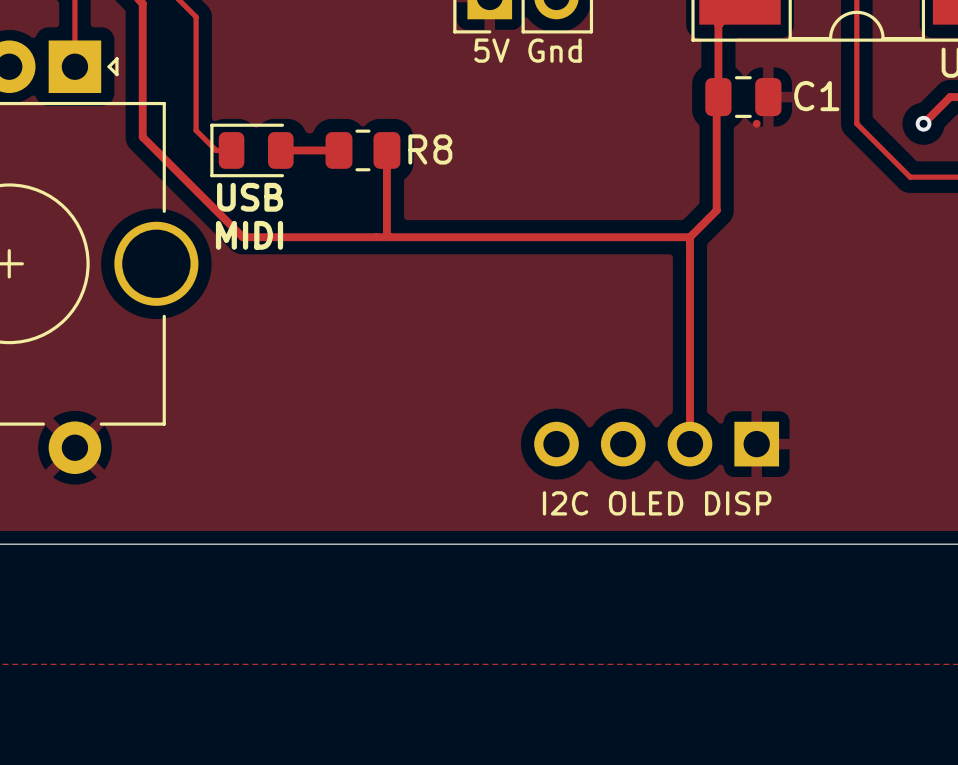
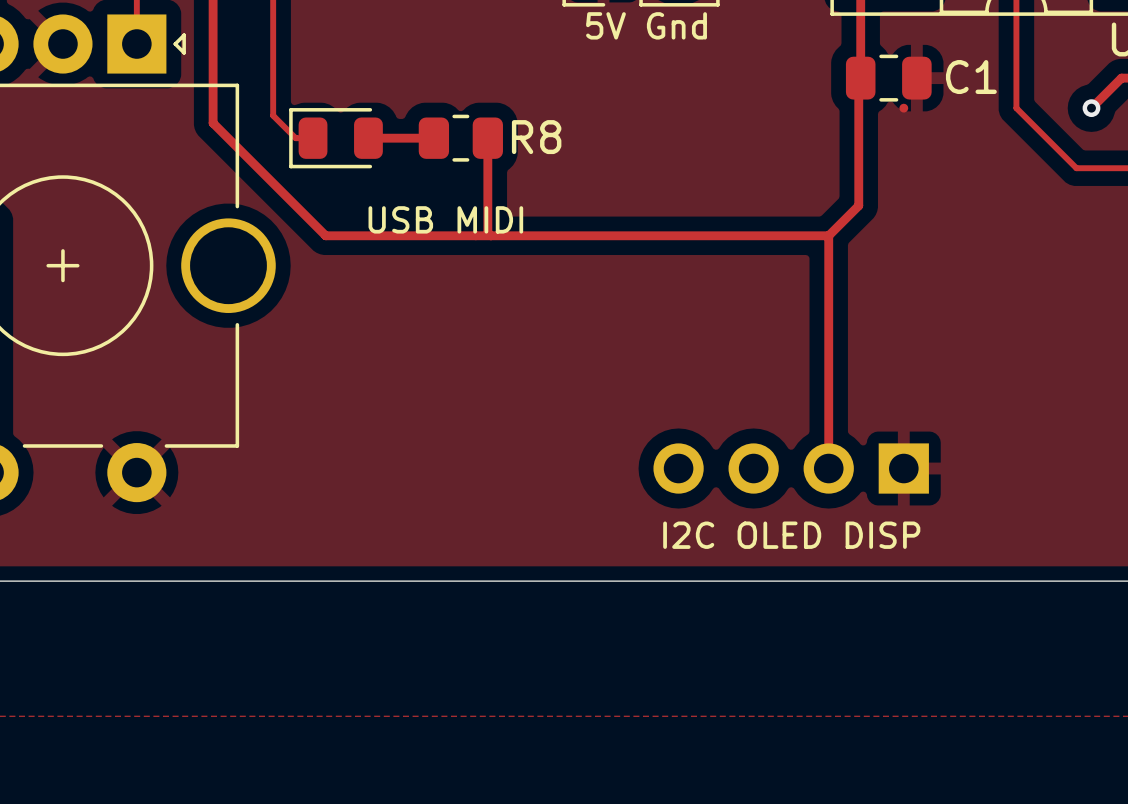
text: USB (250, 197) -> none
text: MIDI (249, 235) -> USB MIDI (445, 219)

